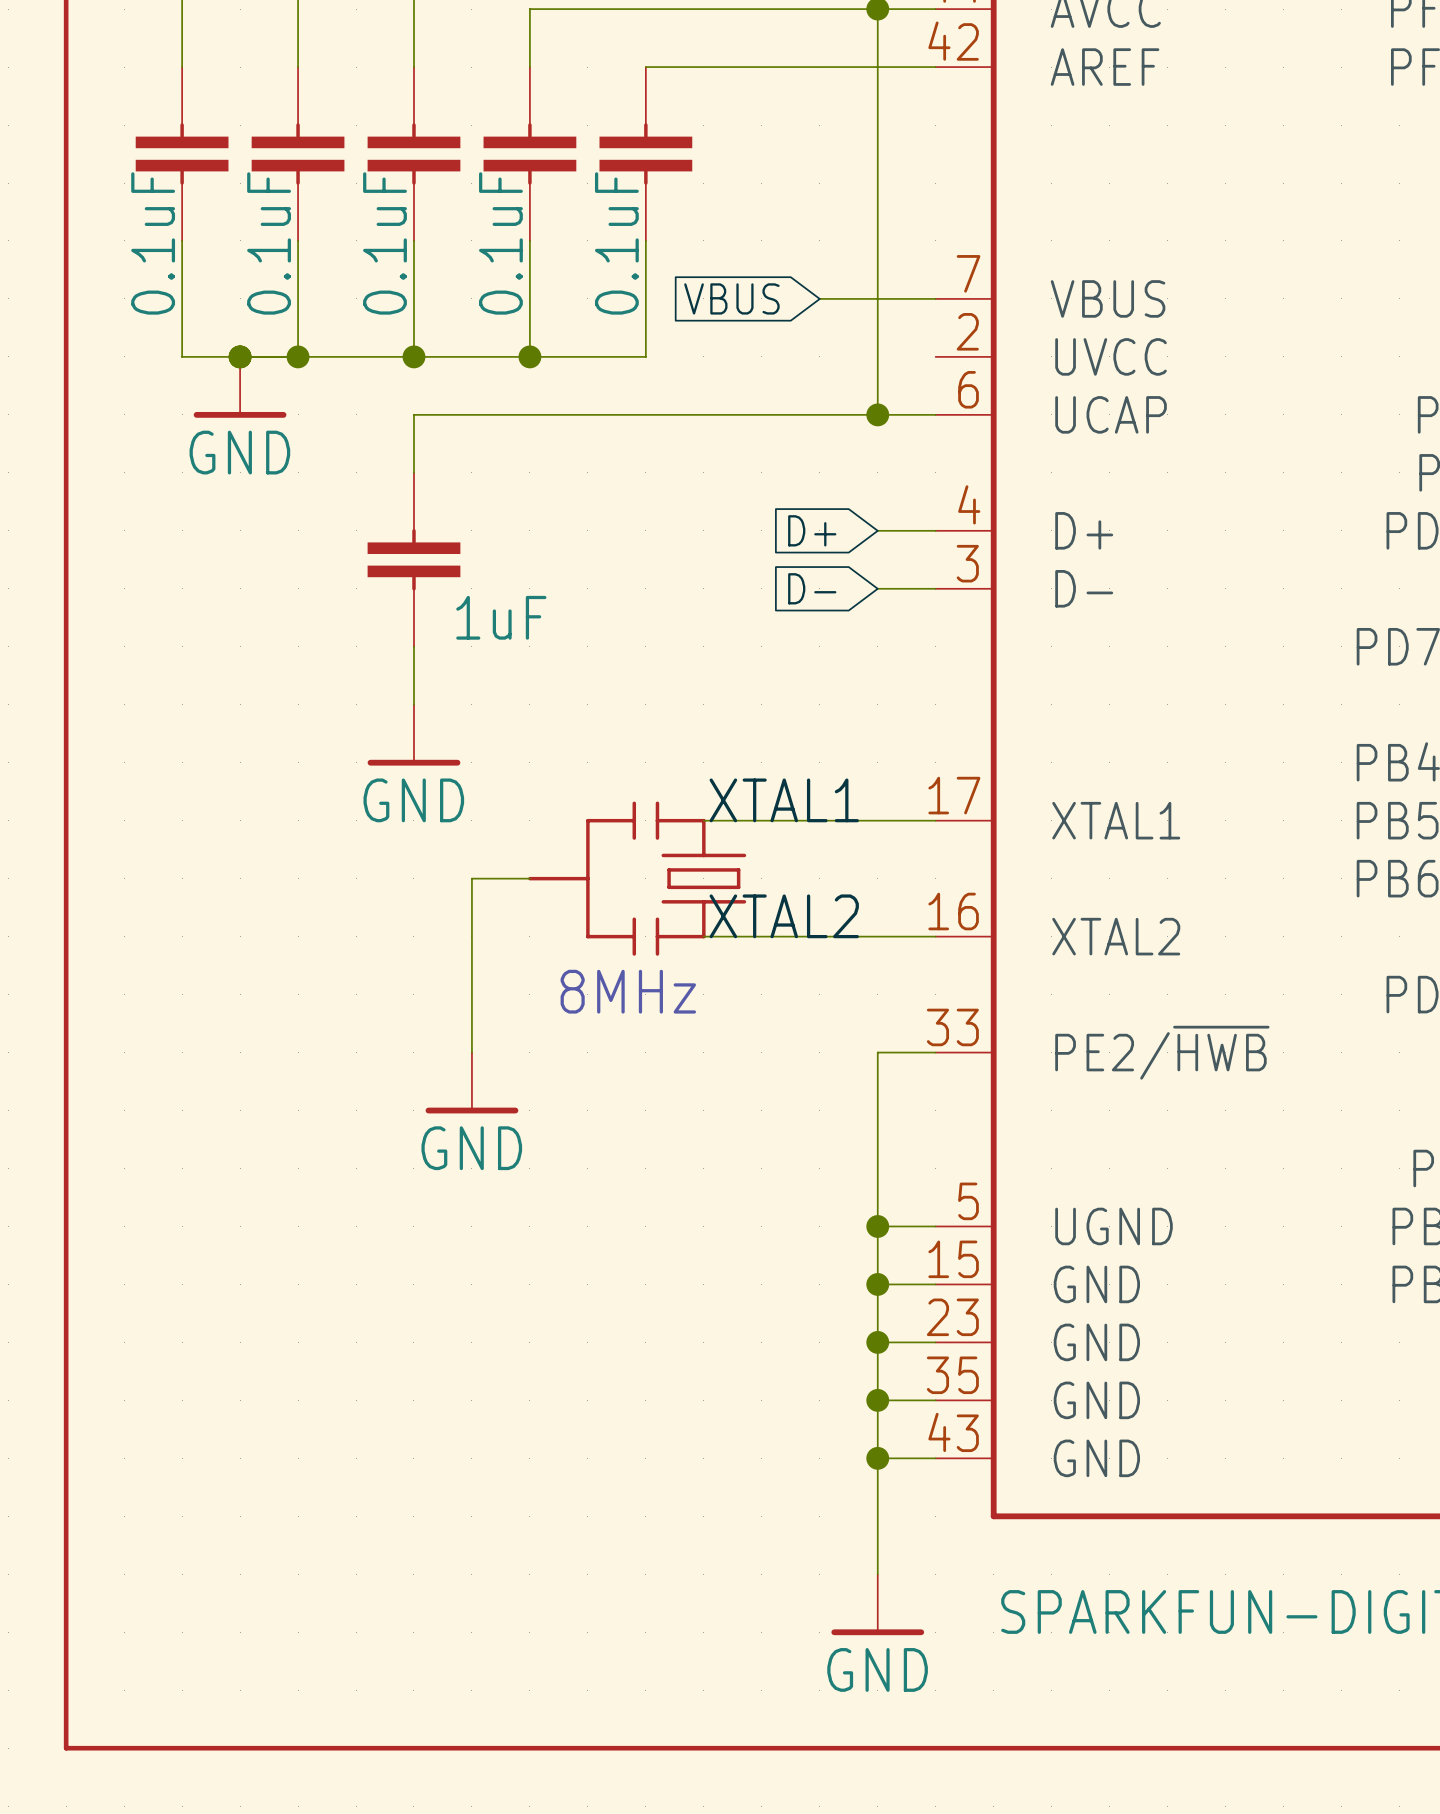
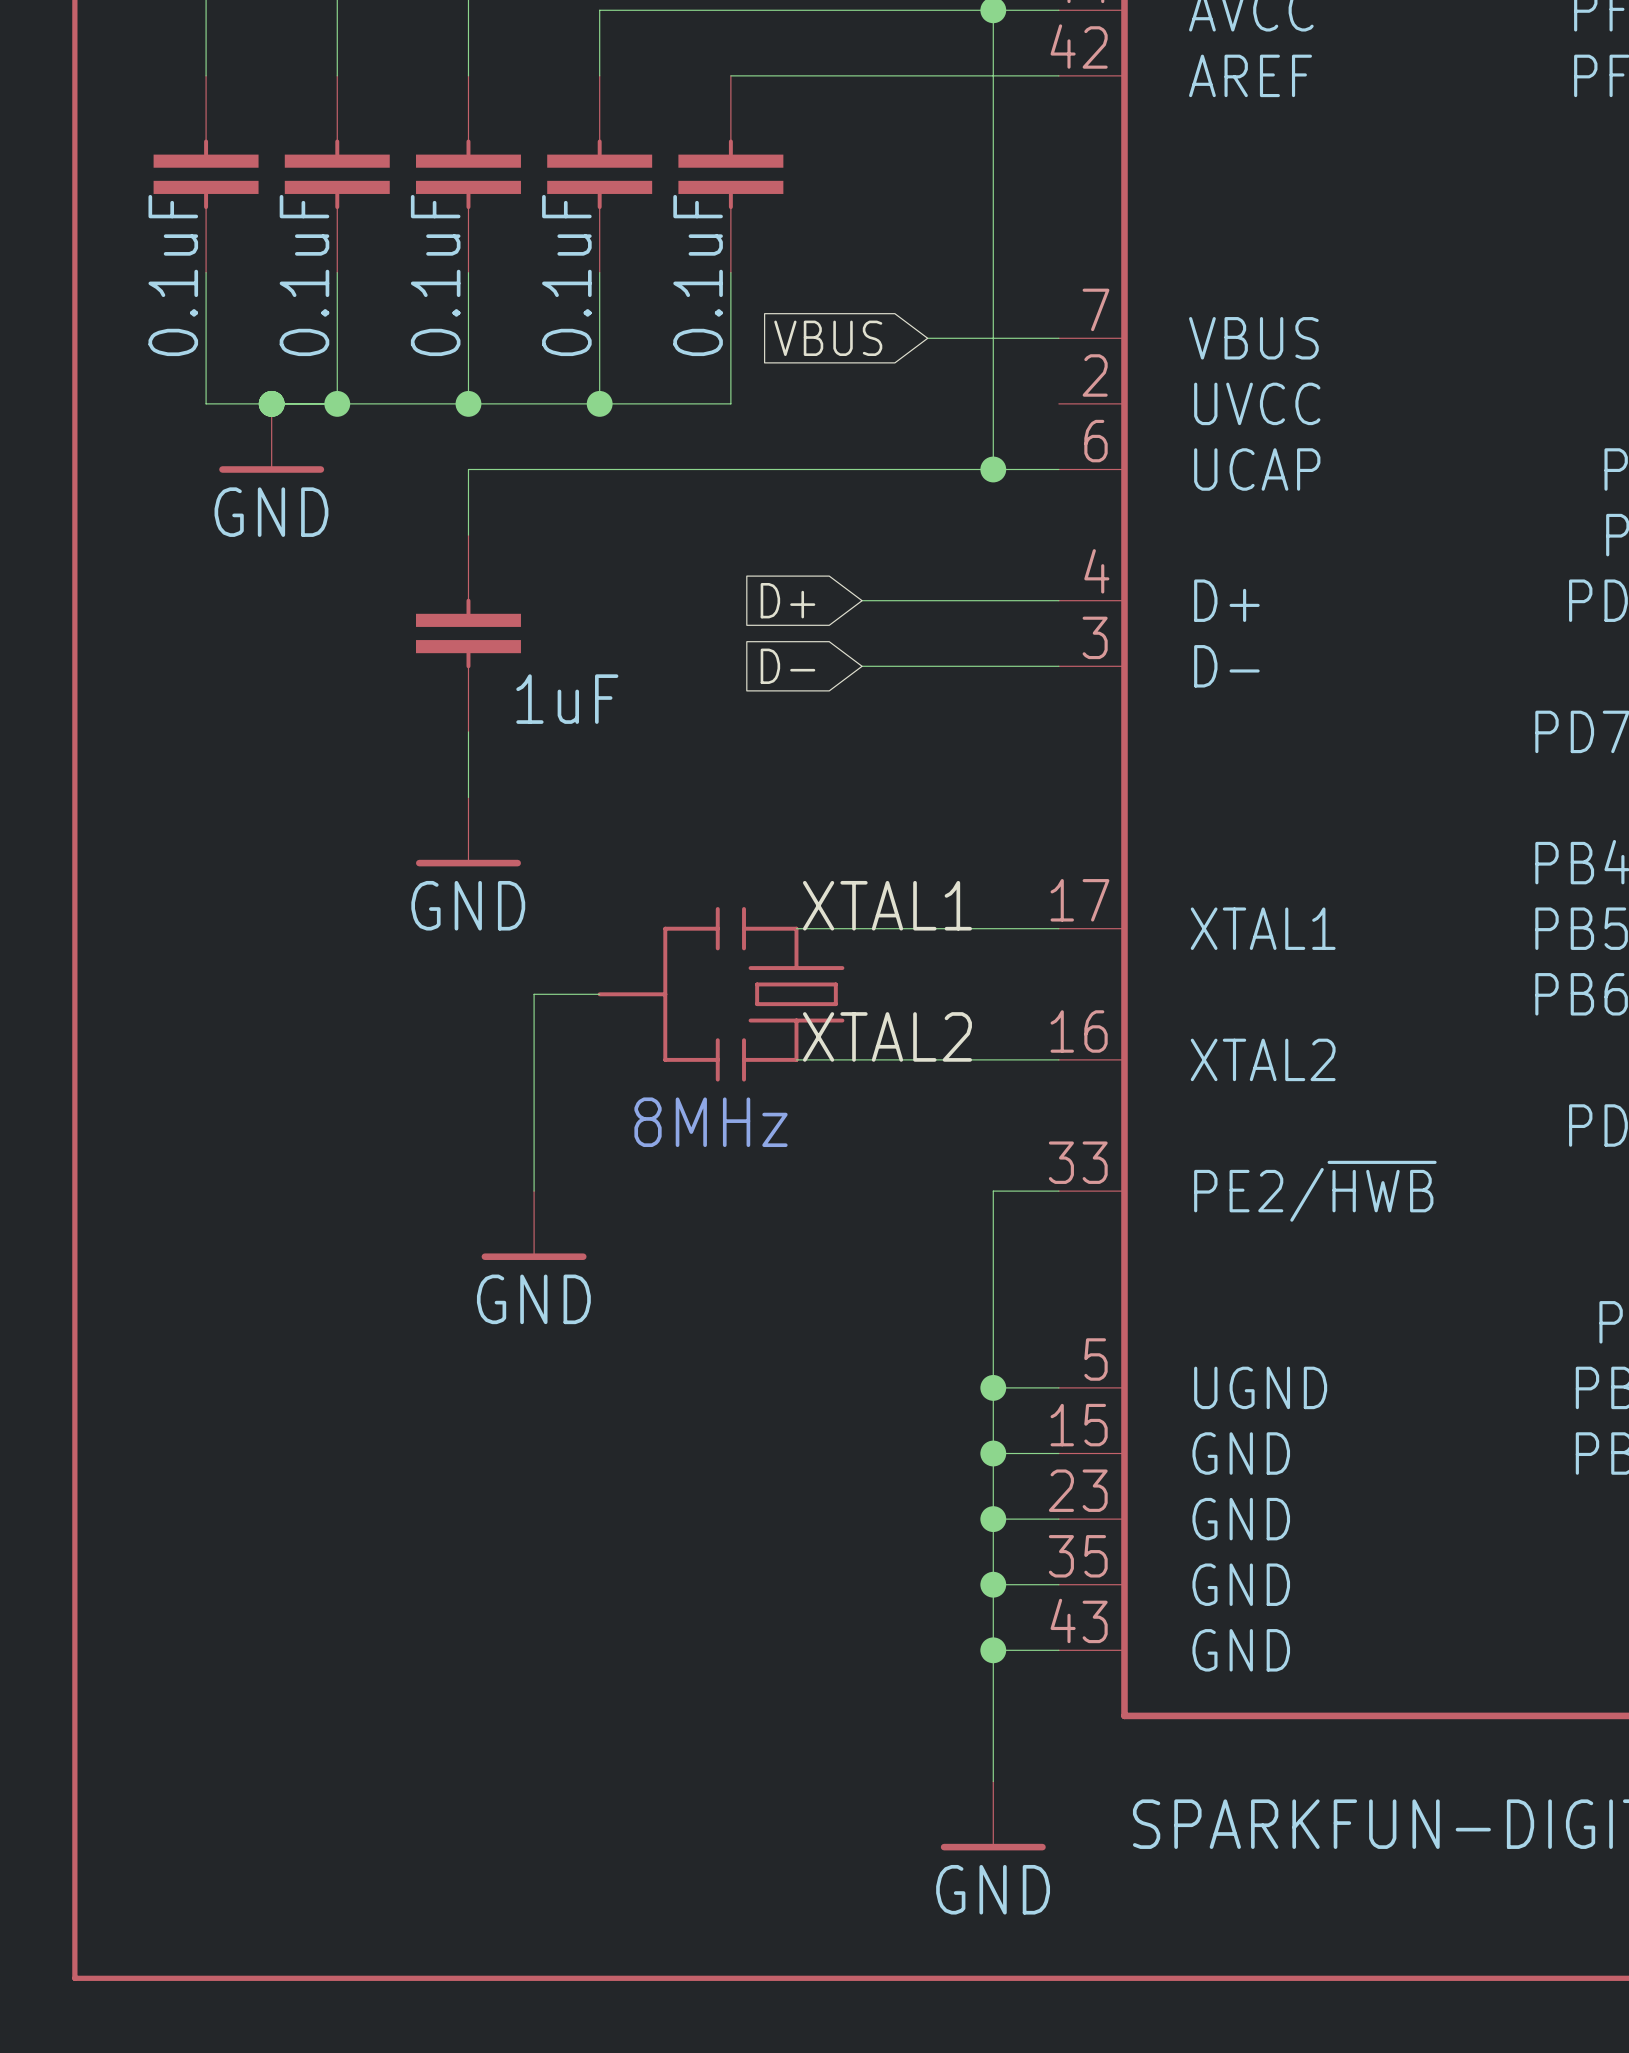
wire: none -> (862, 600) (993, 600)
global label position: D+ (812, 530) -> D+ (787, 600)
wire: none -> (862, 666) (993, 666)
global label position: D- (812, 588) -> D- (787, 666)

